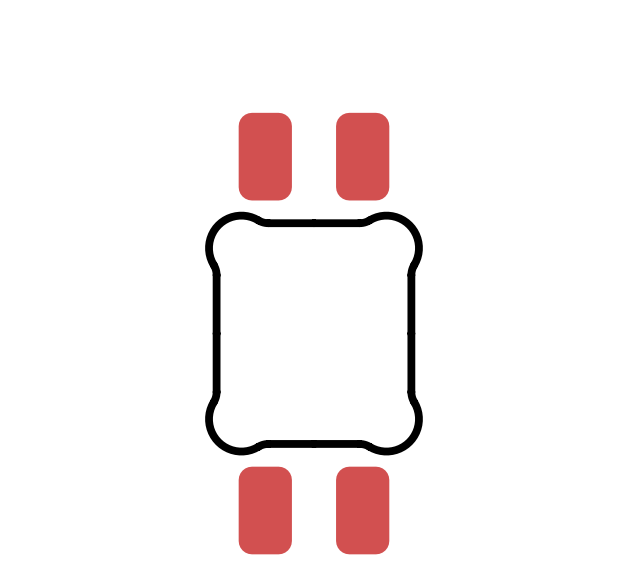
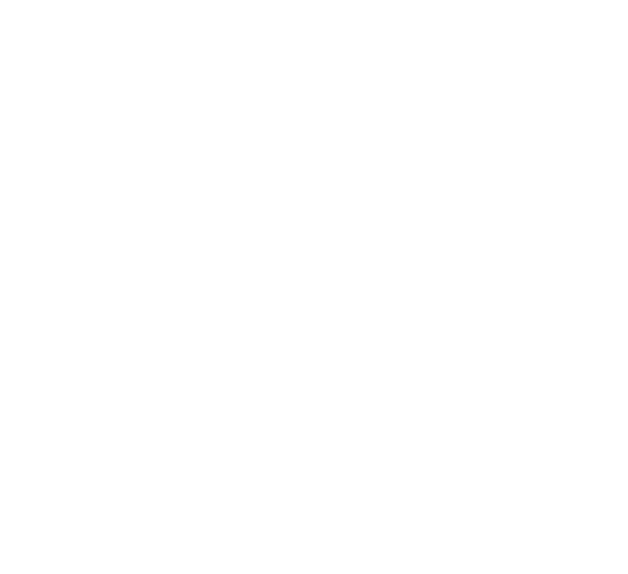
part: (313, 333) -> none

